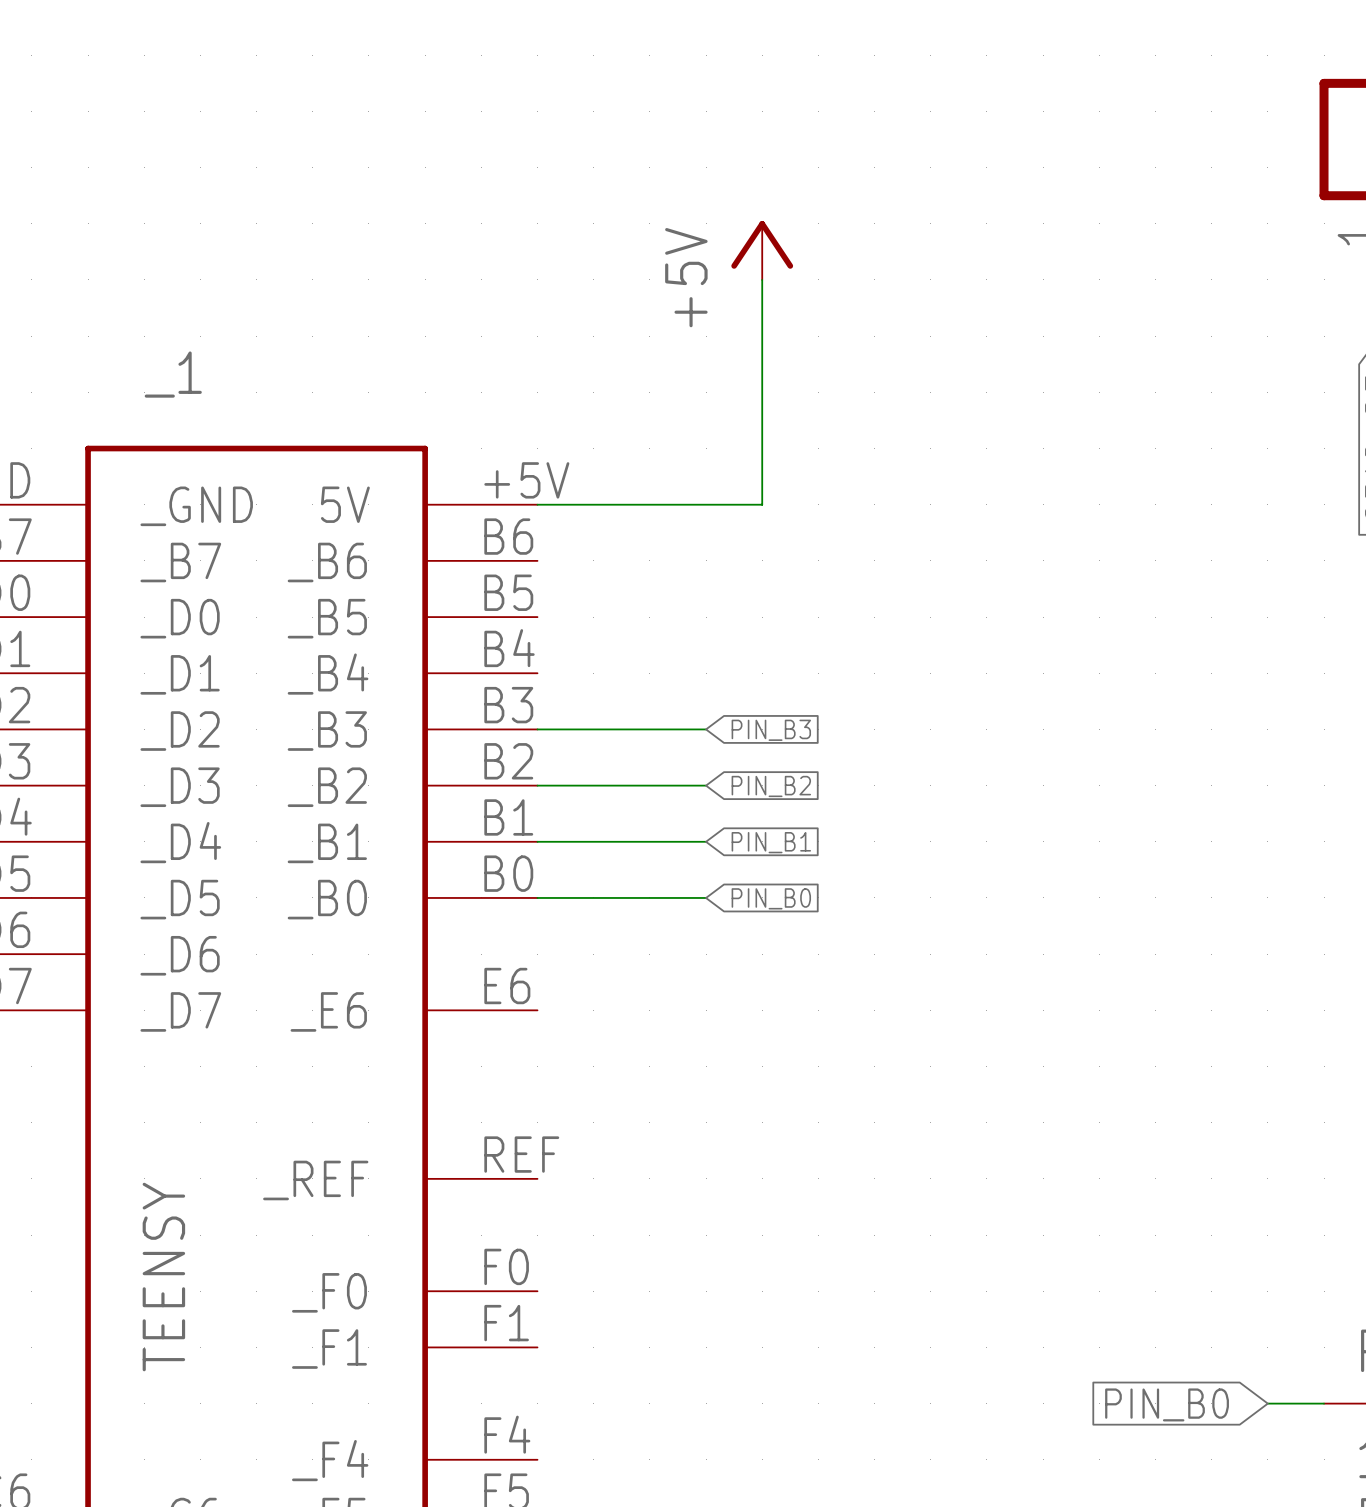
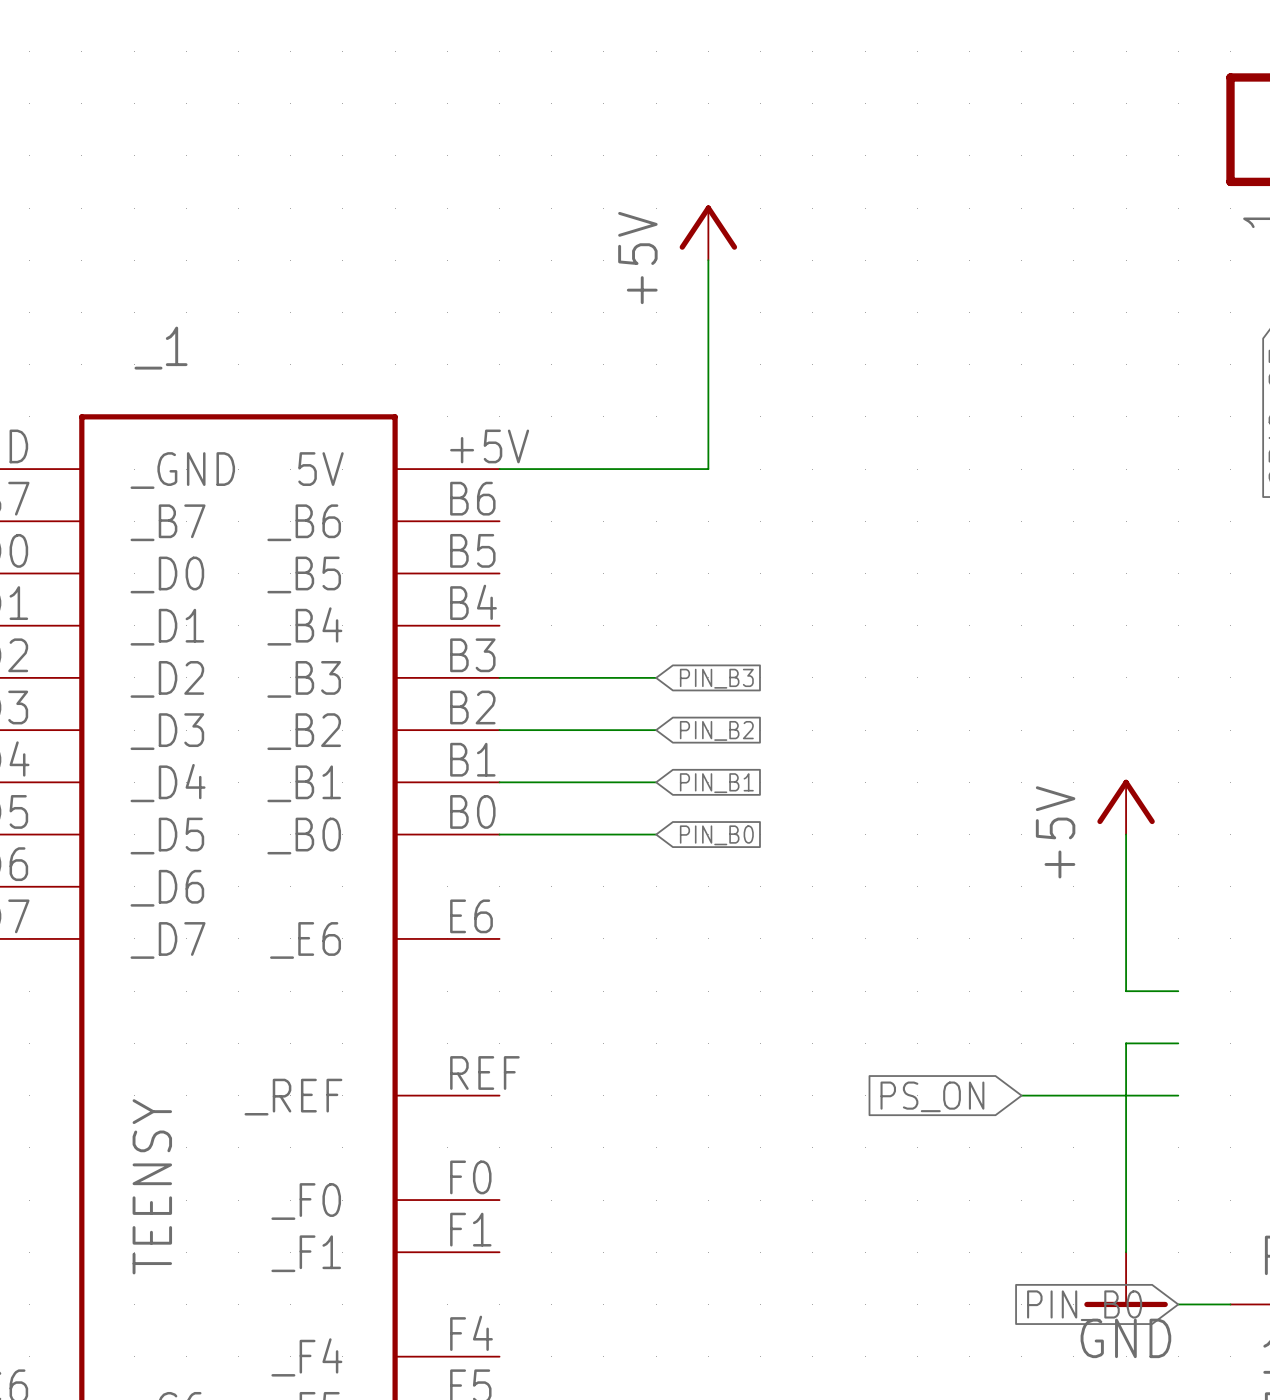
power symbol: none -> +5V (1126, 807)
wire: none -> (1126, 834) (1126, 991) (1178, 991)
wire: none -> (1178, 1043) (1126, 1043) (1126, 1252)
wire: none -> (1021, 1095) (1178, 1095)
global label: none -> PS_ON (932, 1096)
power symbol: none -> GND (1126, 1279)

